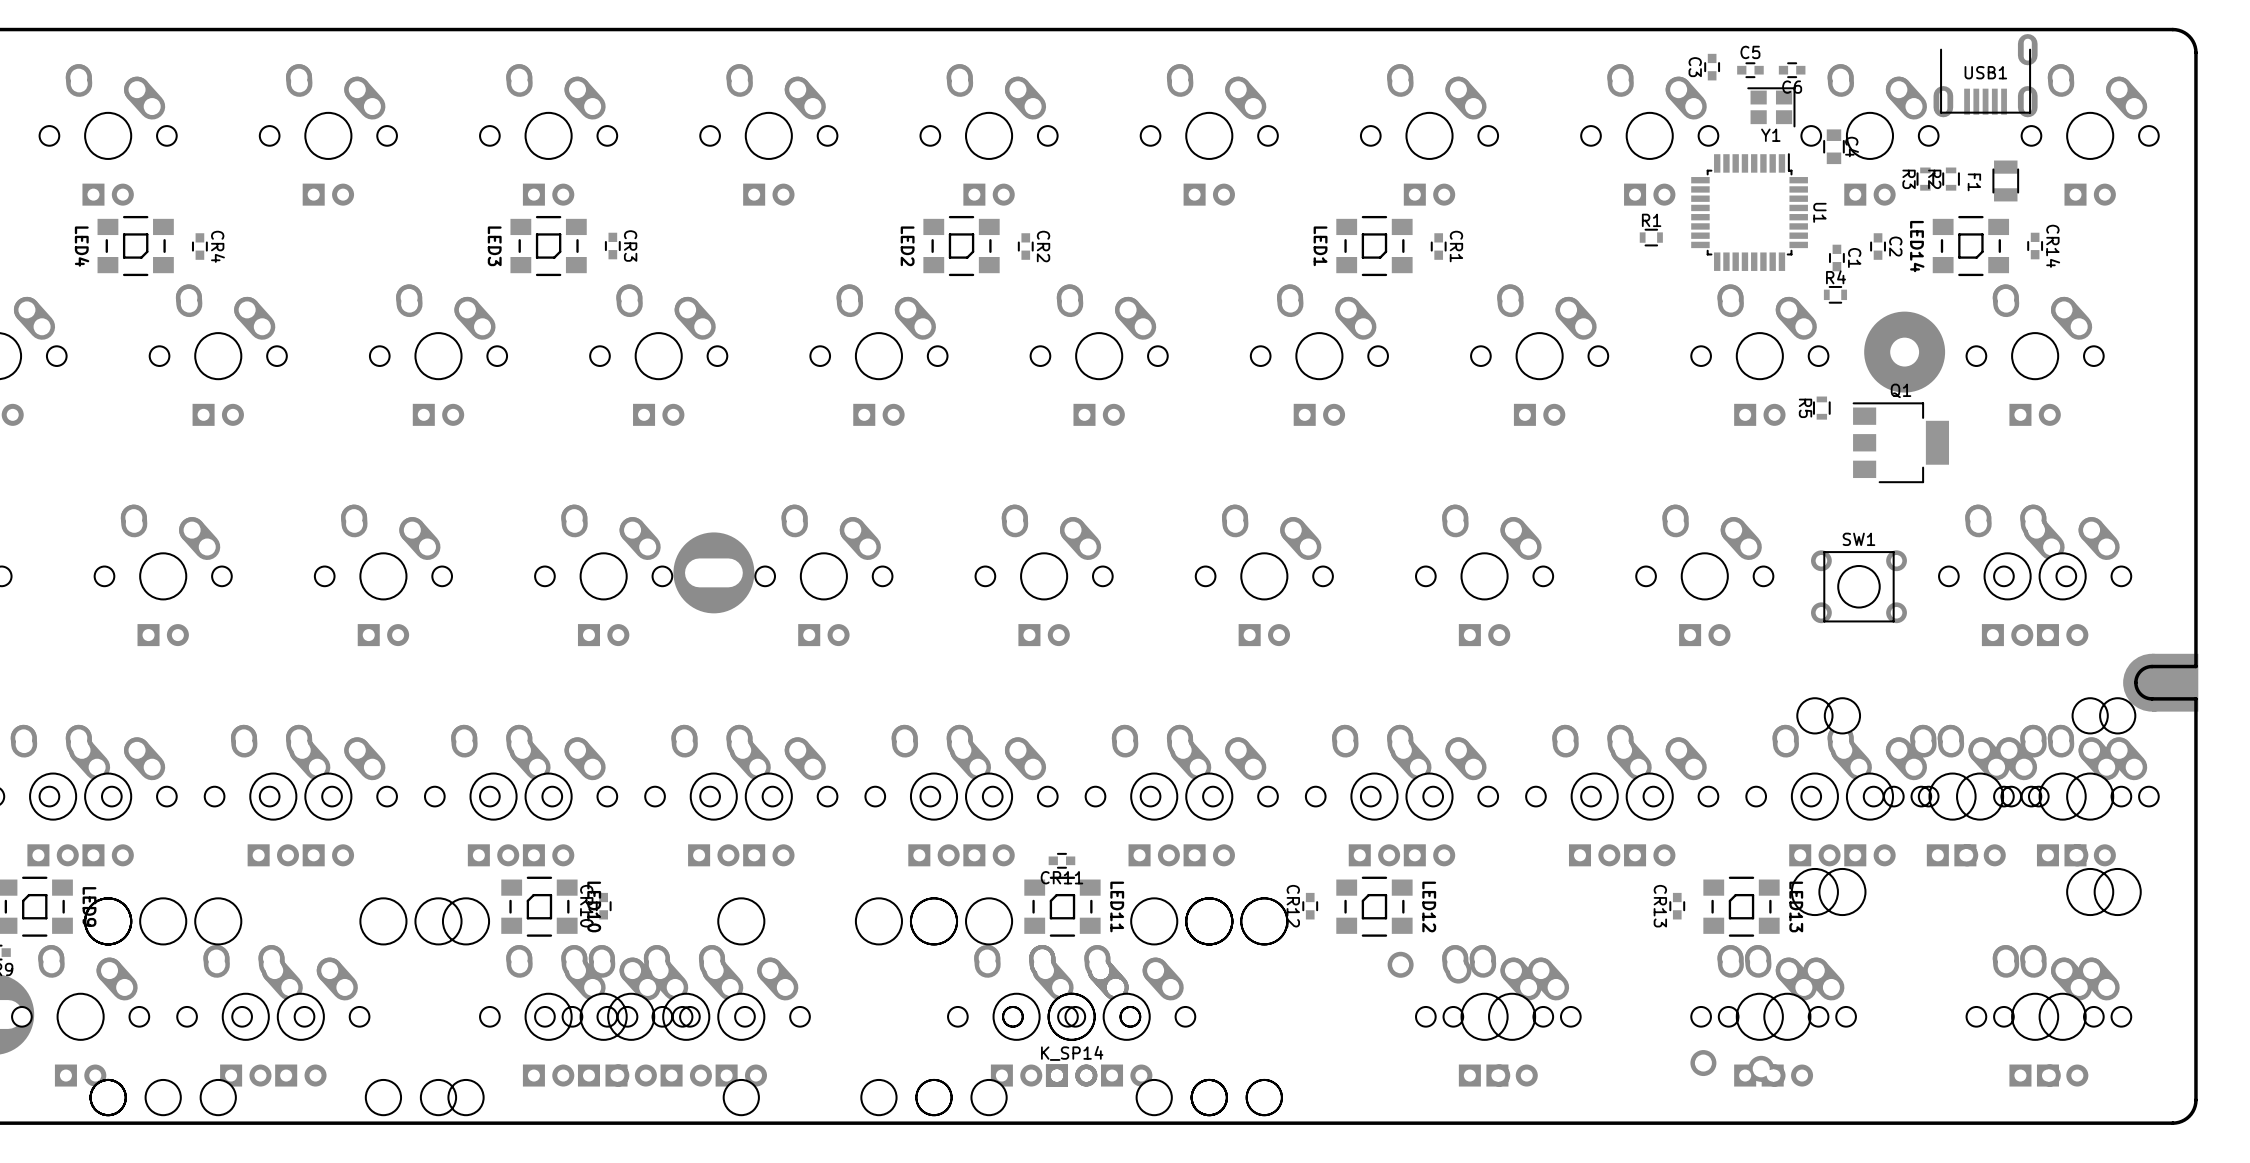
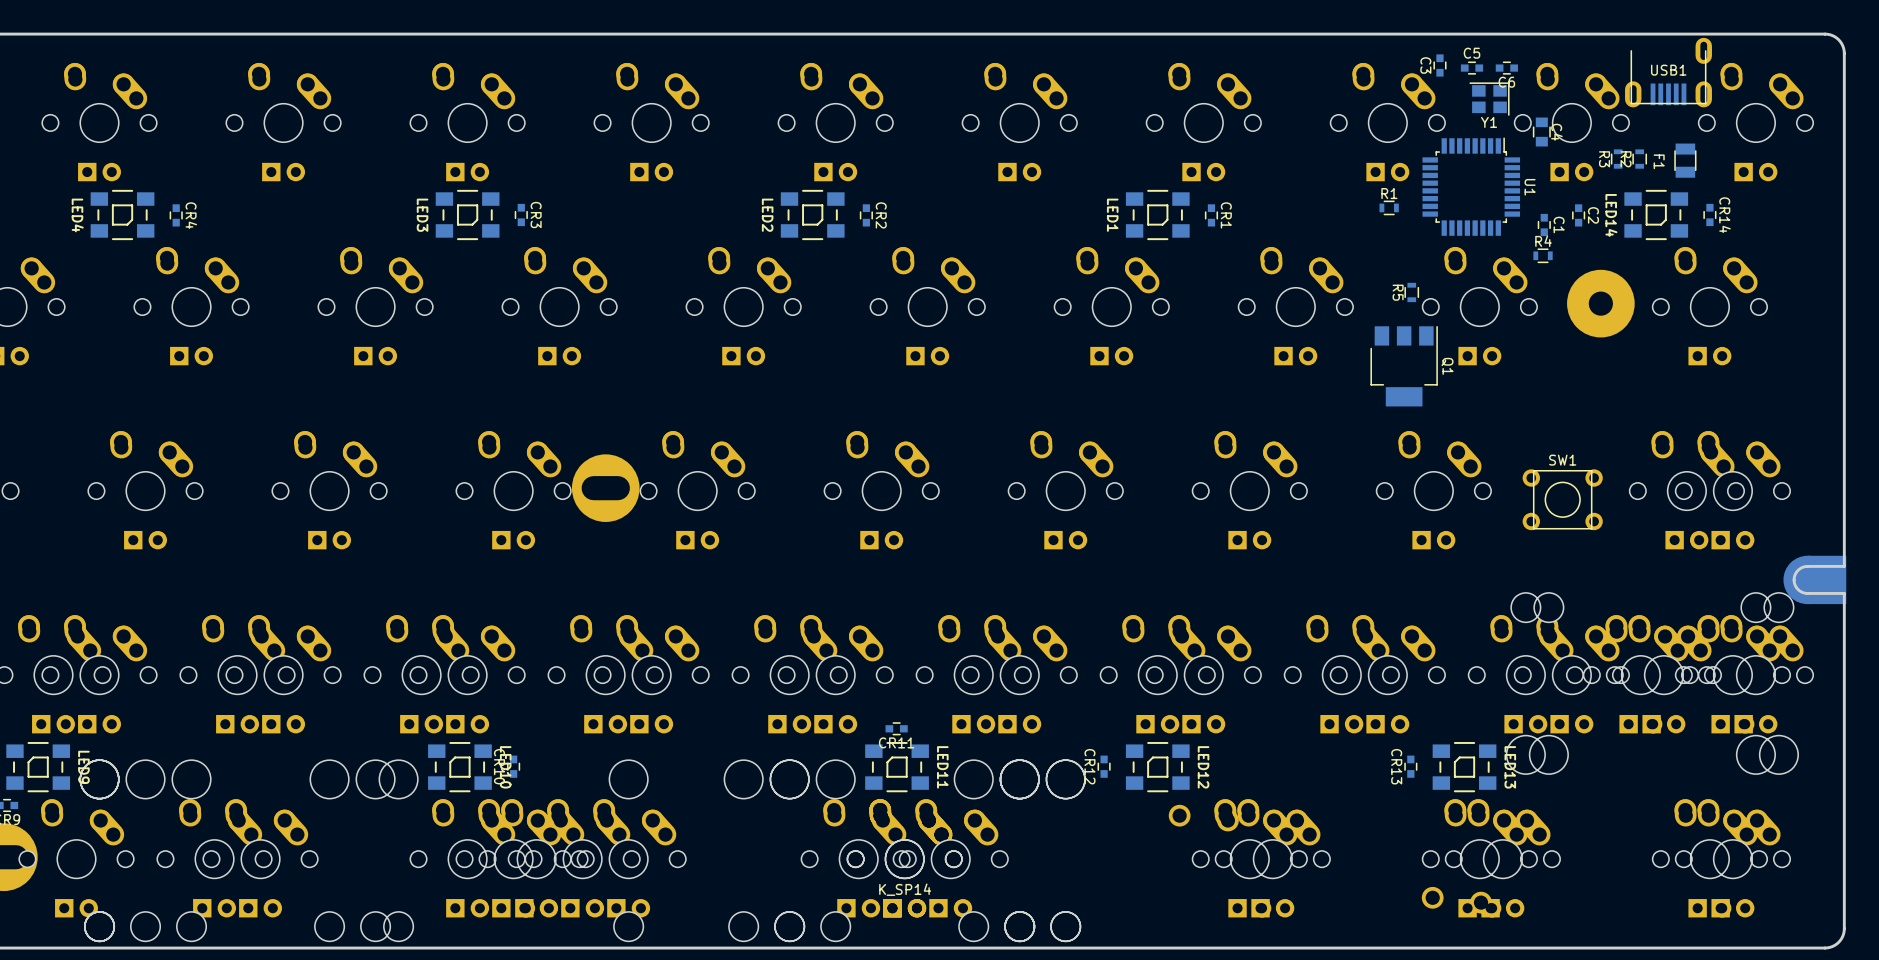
R5 position: (1821, 408) -> (1411, 292)
Q1 rotation: 0° (1900, 442) -> 90° clockwise (1404, 366)
Q1 position: (1900, 442) -> (1404, 366)

